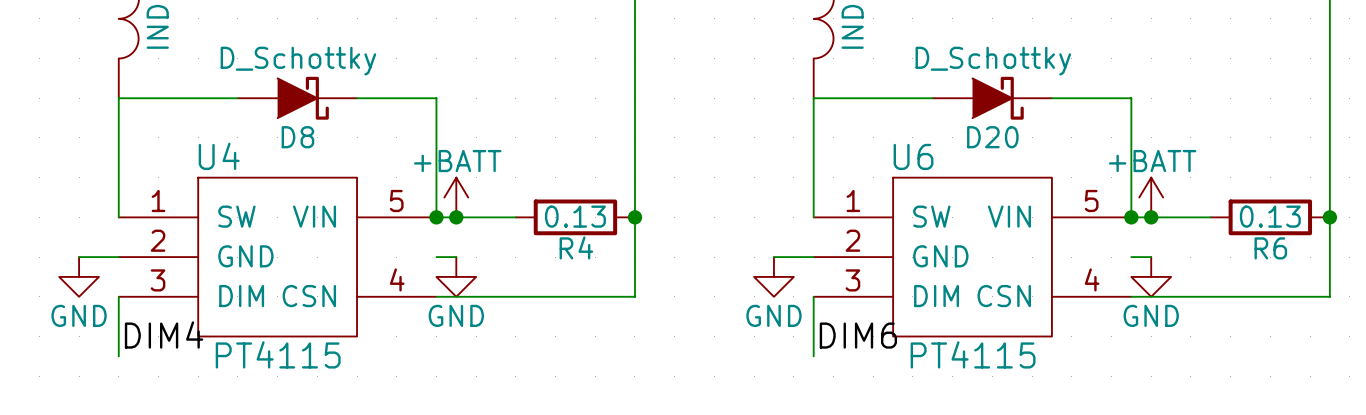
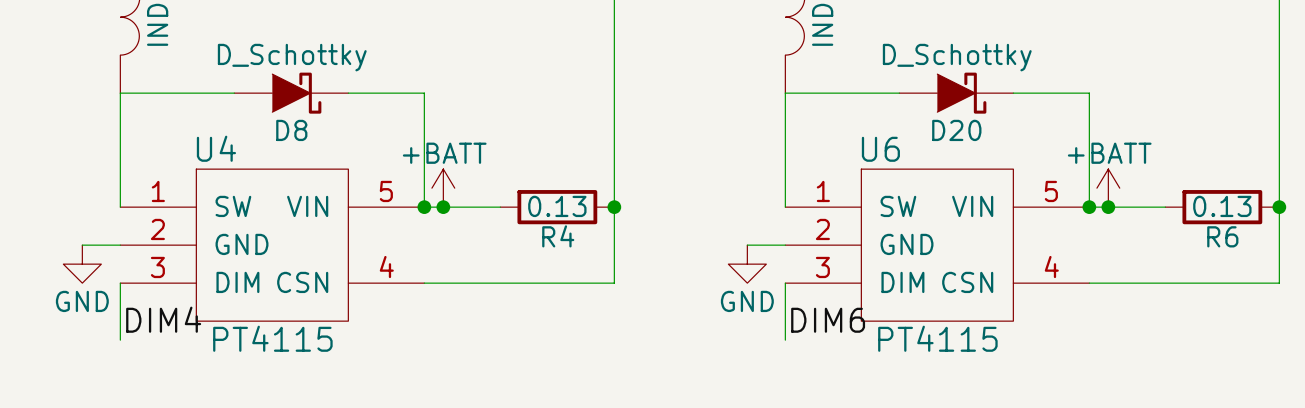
wire: (436, 257) (456, 257) -> none
wire: (1131, 257) (1151, 257) -> none
power symbol: GND (456, 276) -> none
power symbol: GND (1151, 276) -> none

